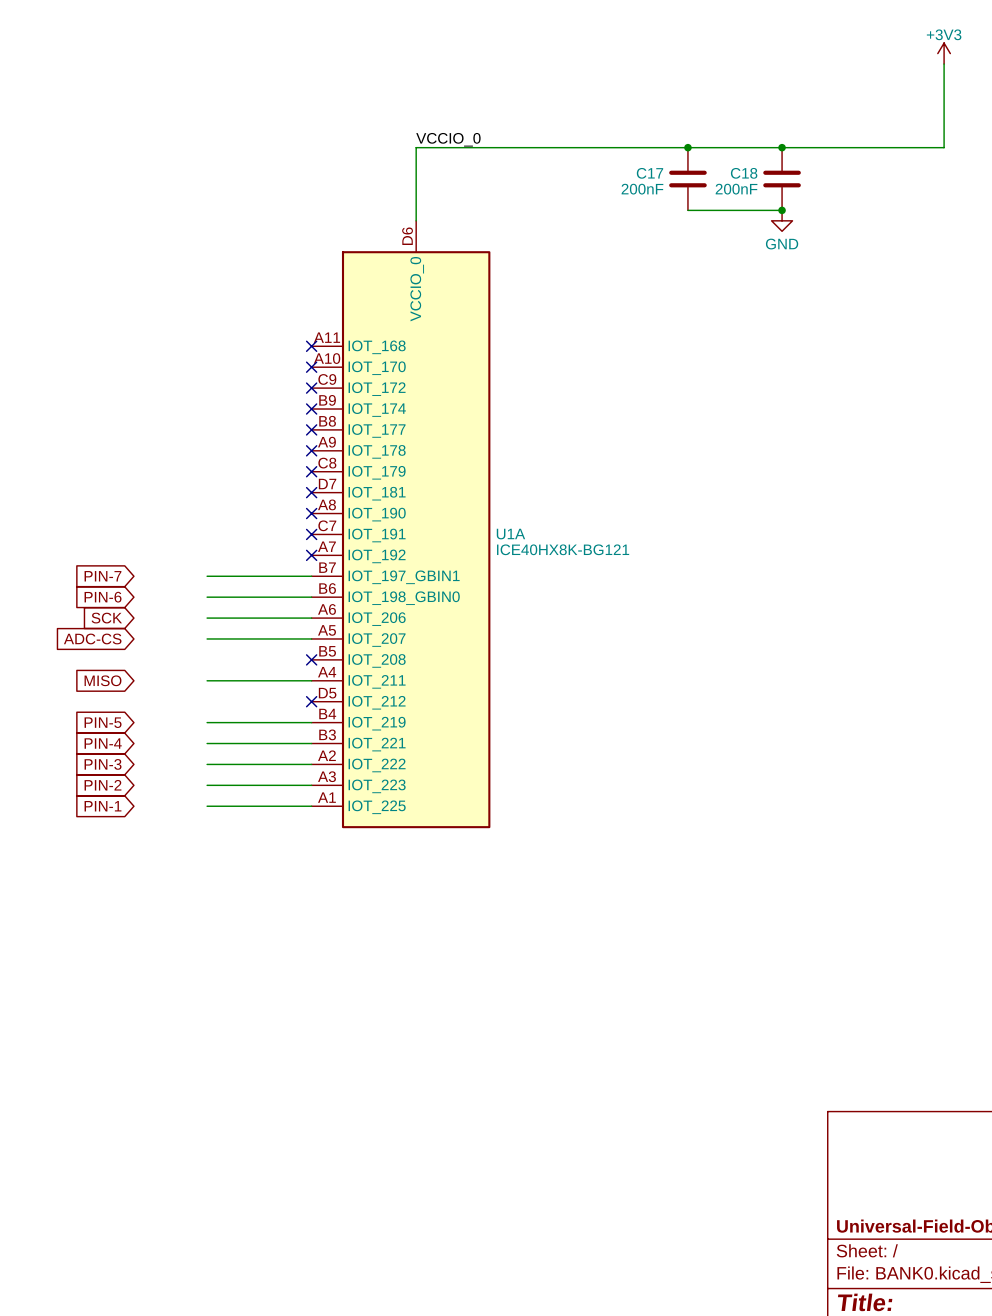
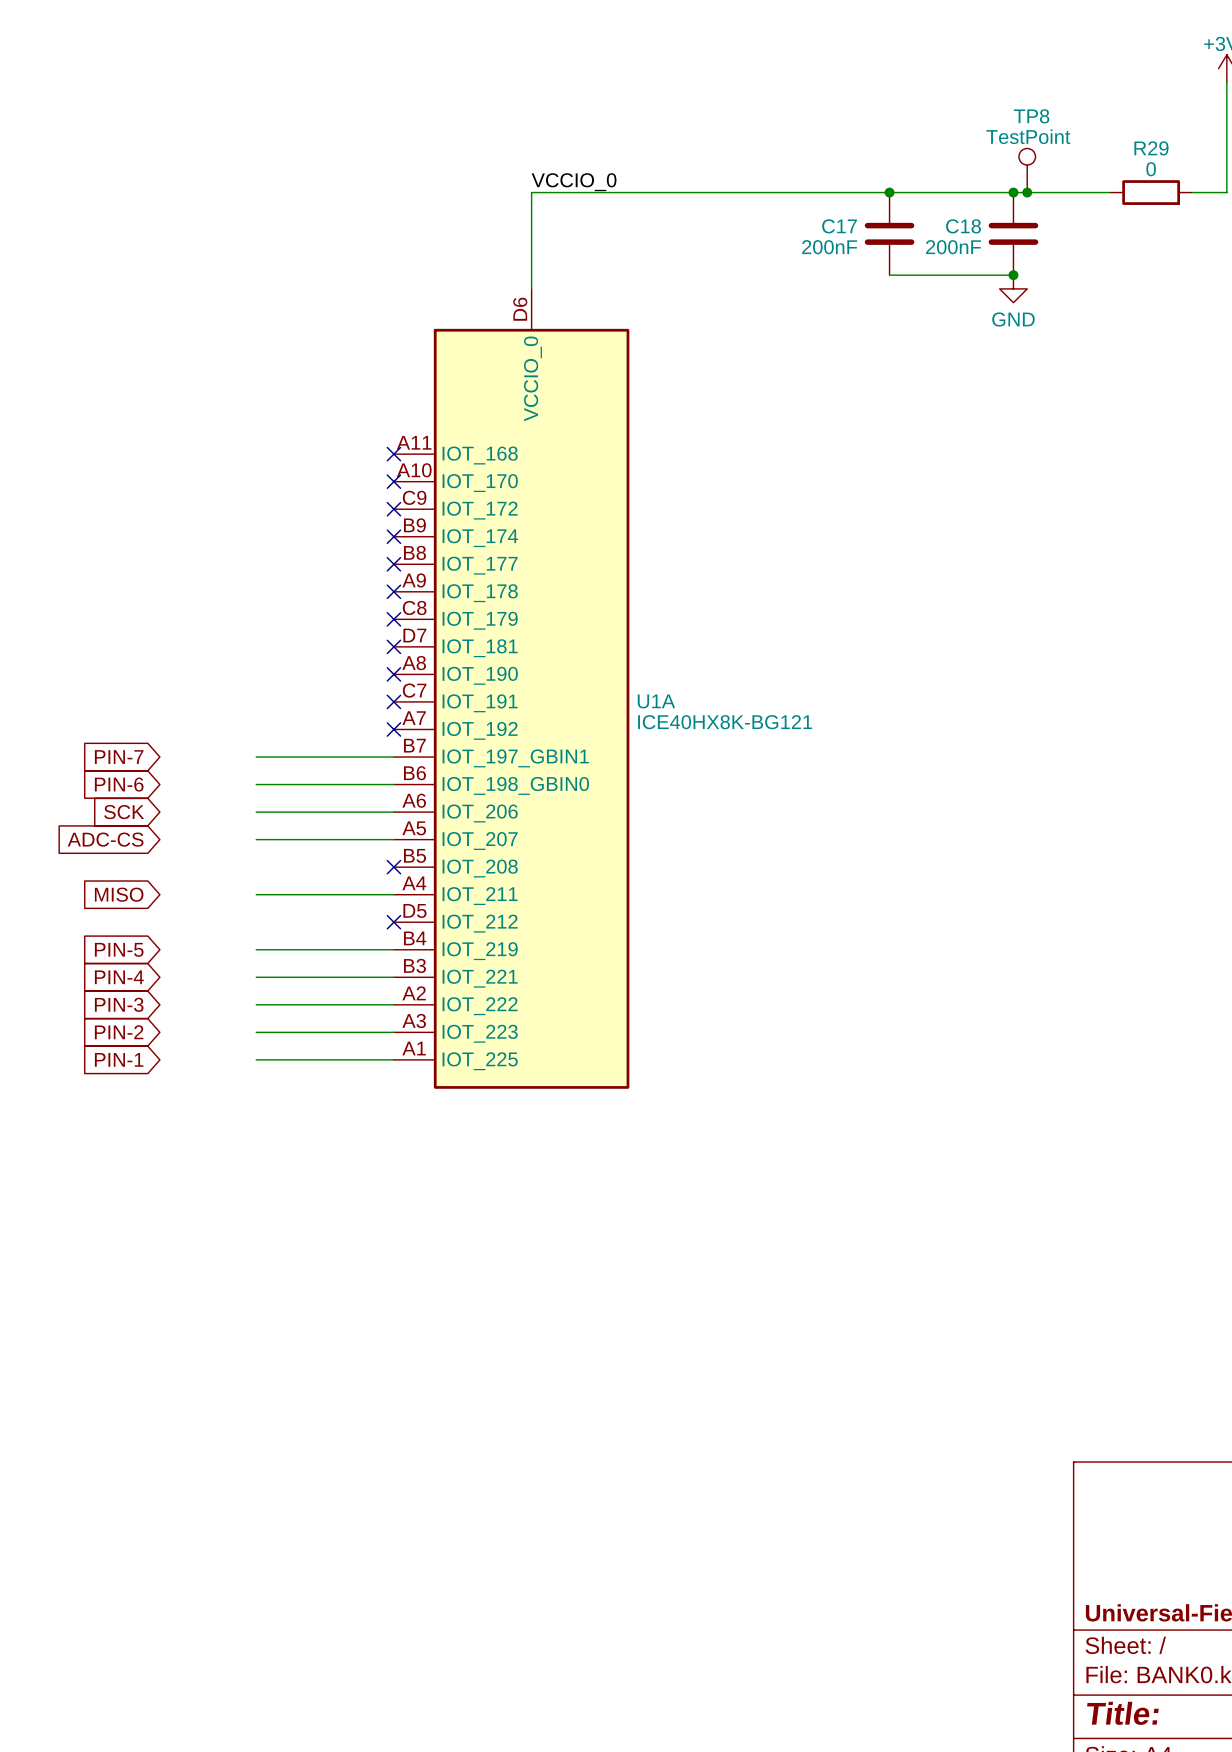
TP8: none -> TestPoint (1027, 170)
junction: none -> (1027, 192)
wire: (855, 147) (917, 147) -> none
R29: none -> 0 (1151, 192)

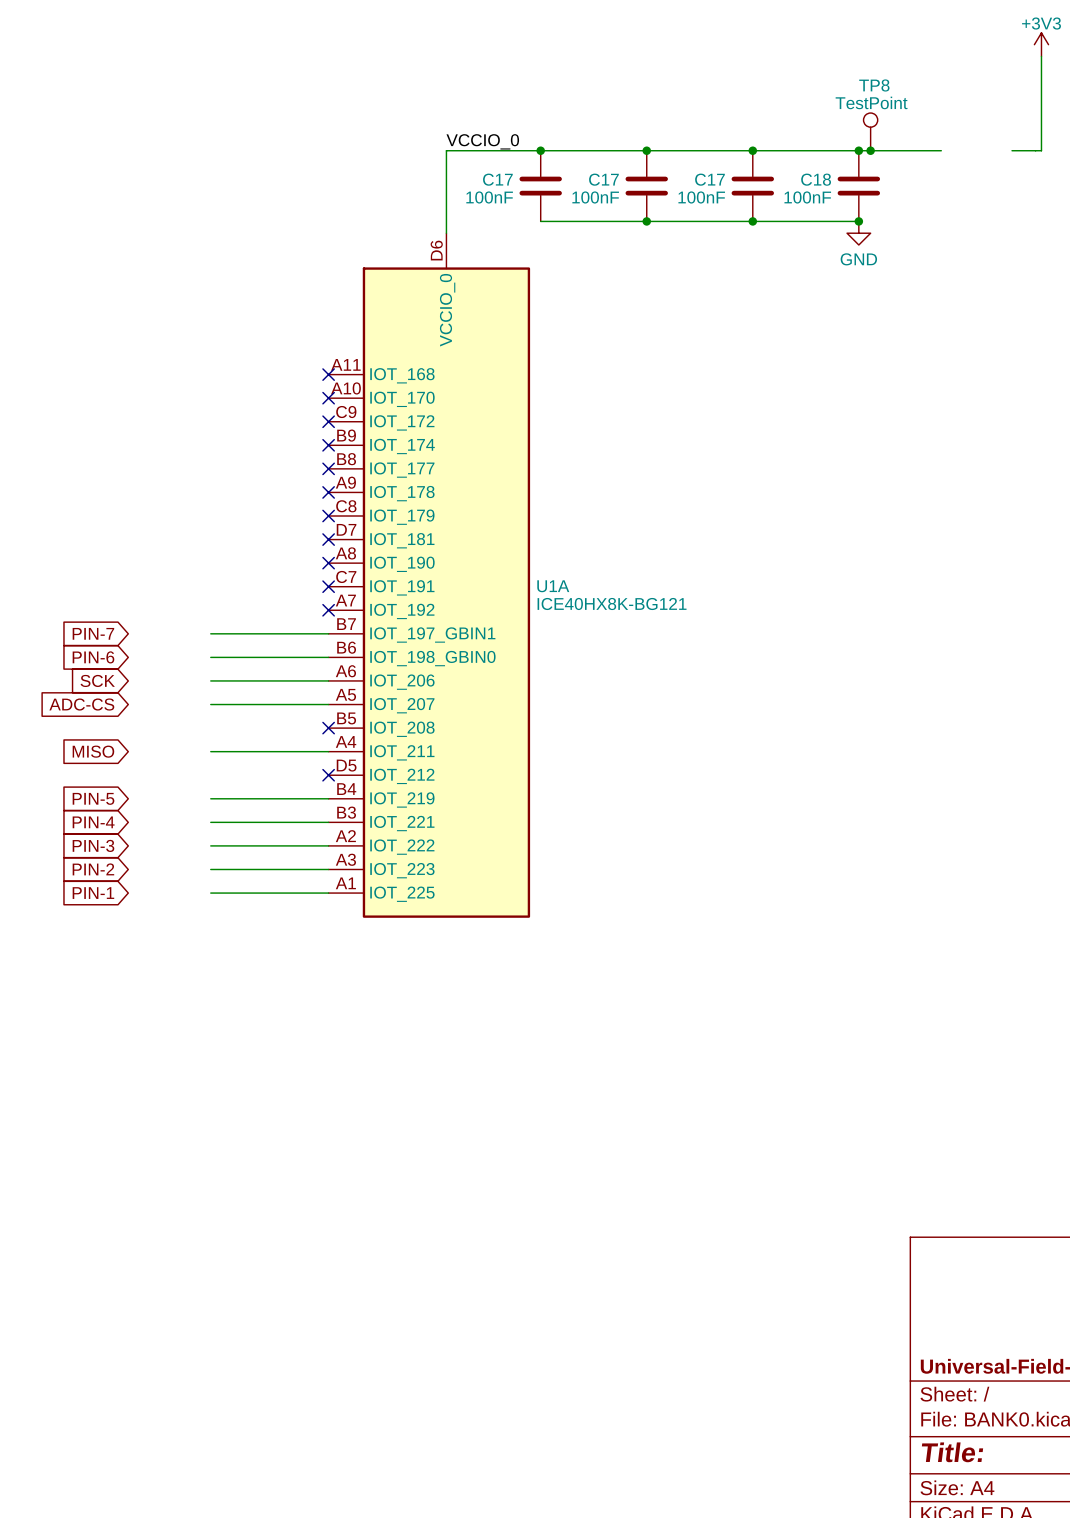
junction: none -> (540, 150)
junction: none -> (646, 150)
R29: 0 (1151, 192) -> none
C17: none -> 100nF (540, 186)
C17: none -> 100nF (646, 186)
C17 value: 200nF (829, 247) -> 100nF (701, 197)
C18 value: 200nF (953, 247) -> 100nF (807, 197)
wire: none -> (540, 221) (752, 221)
junction: none -> (646, 221)
junction: none -> (752, 221)

